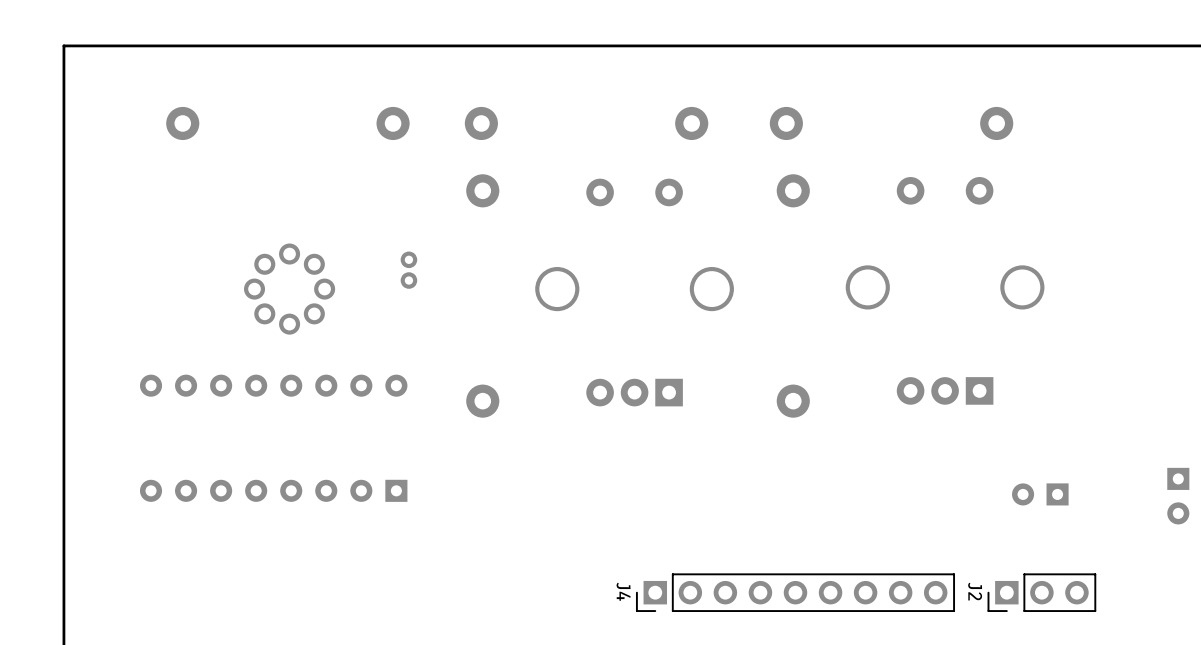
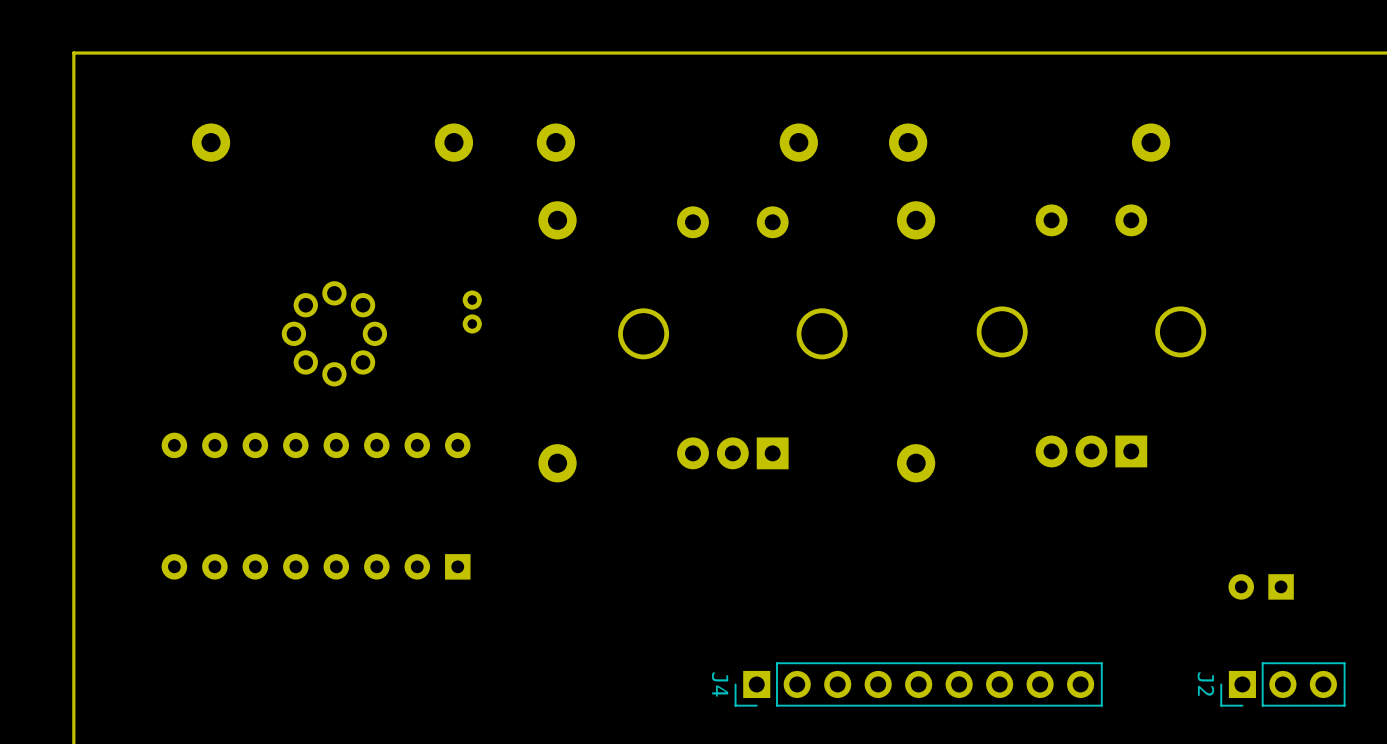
part: (1040, 494) -> none
part: (1178, 496) -> none
part: none -> (1261, 586)
J2 position: (1041, 592) -> (1282, 684)

